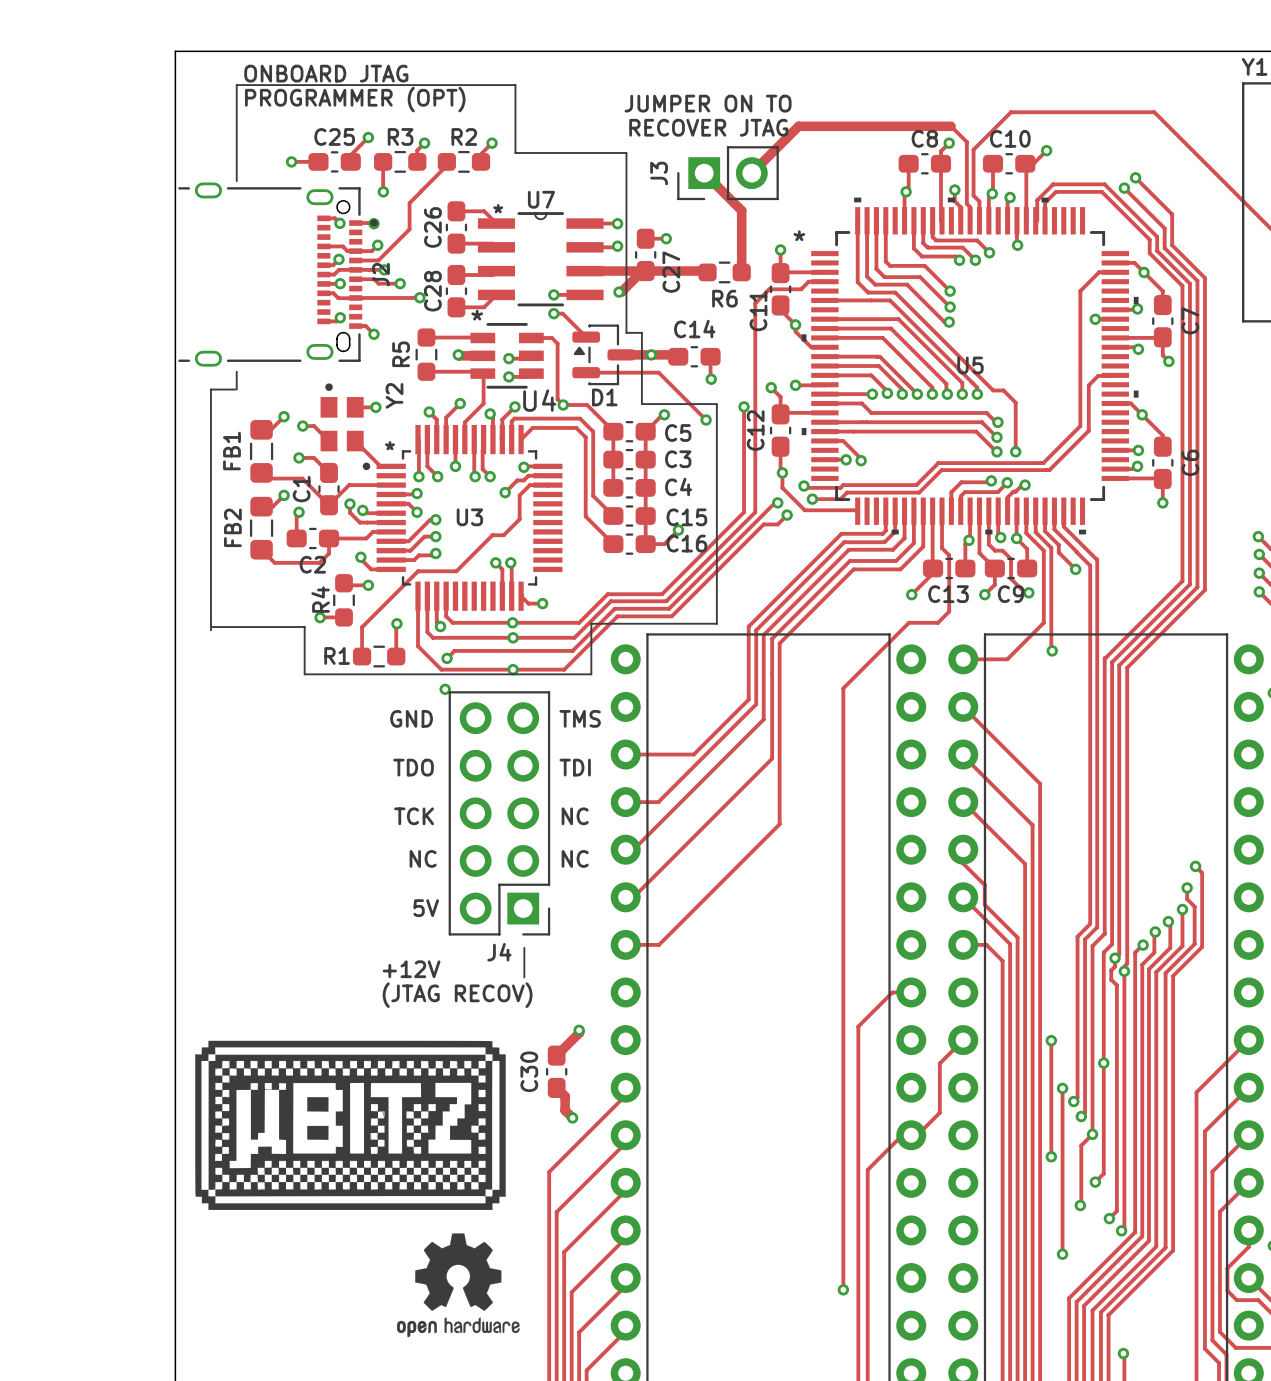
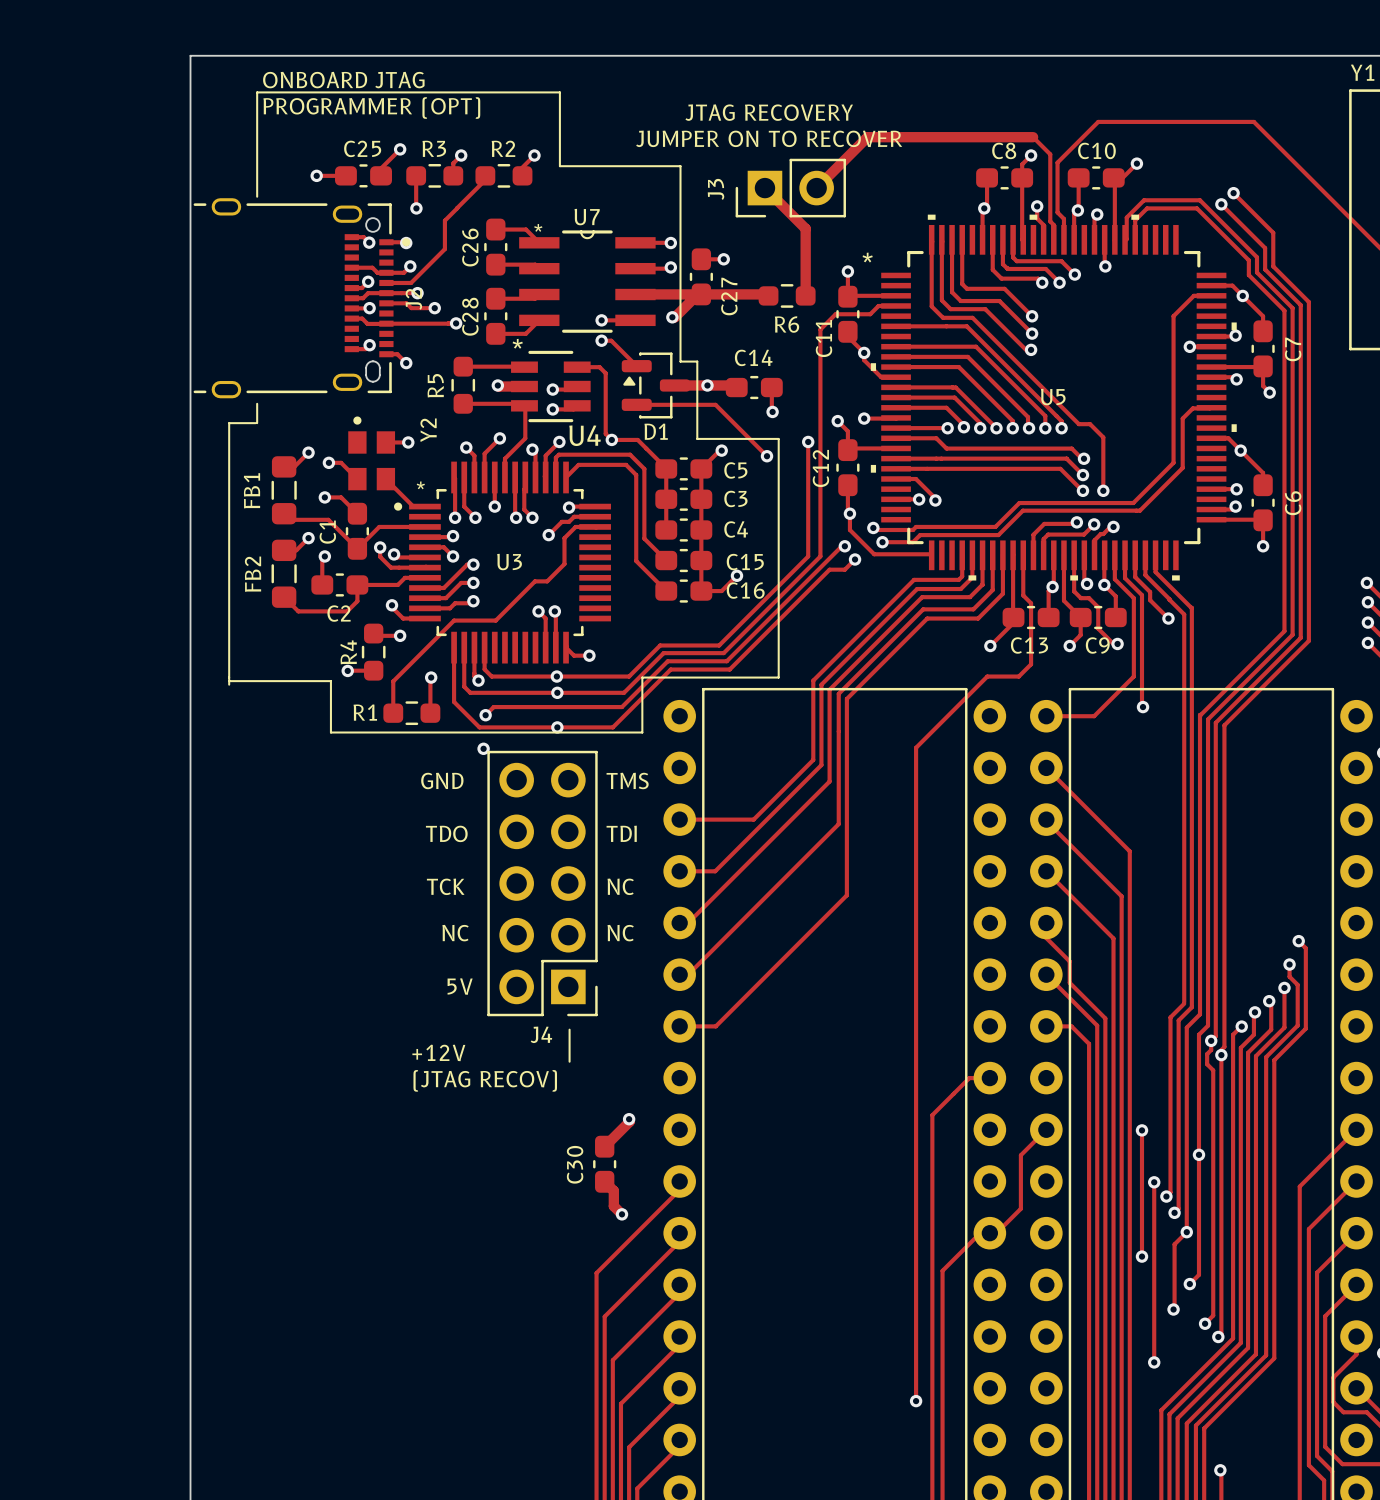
text: JUMPER ON TO (708, 103) -> JTAG RECOVERY (769, 112)
text: RECOVER JTAG (708, 127) -> JUMPER ON TO RECOVER (769, 138)
drawing: [195, 1040, 506, 1210] -> none
drawing: [397, 1233, 520, 1338] -> none

